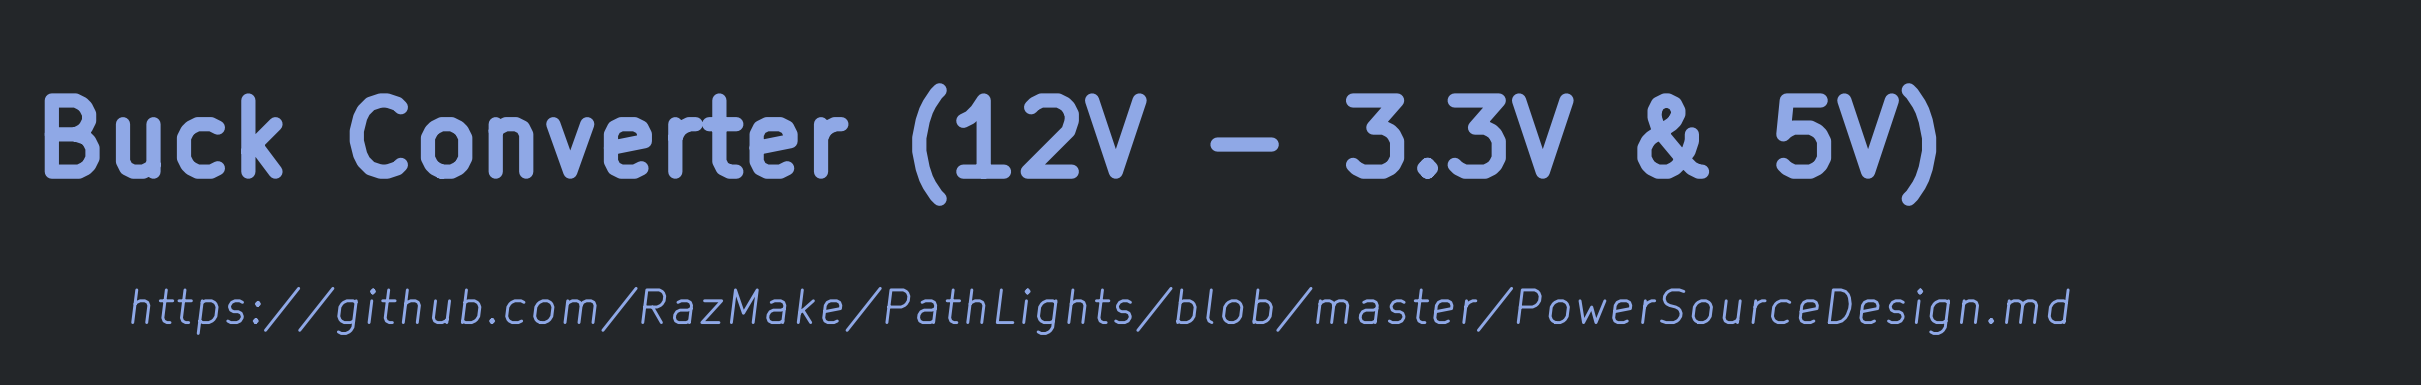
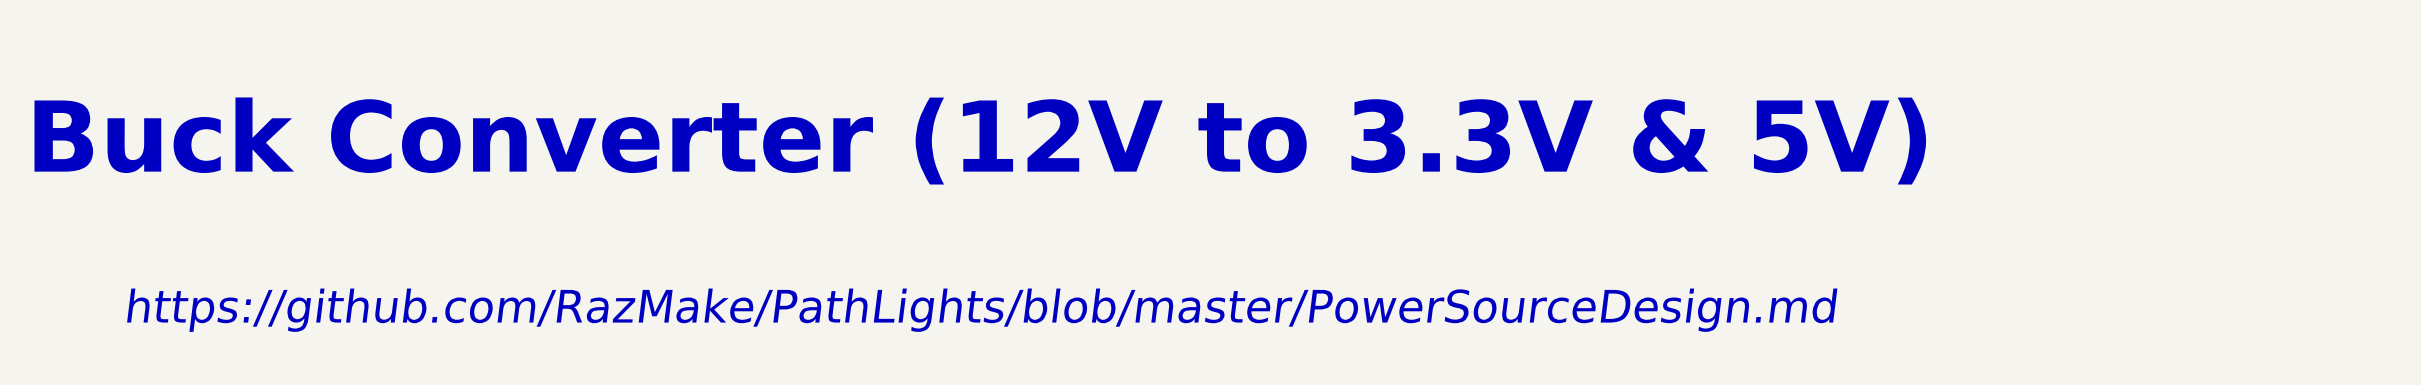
text: Buck Converter (12V - 3.3V & 5V) (990, 144) -> Buck Converter (12V to 3.3V & 5V) (980, 140)

